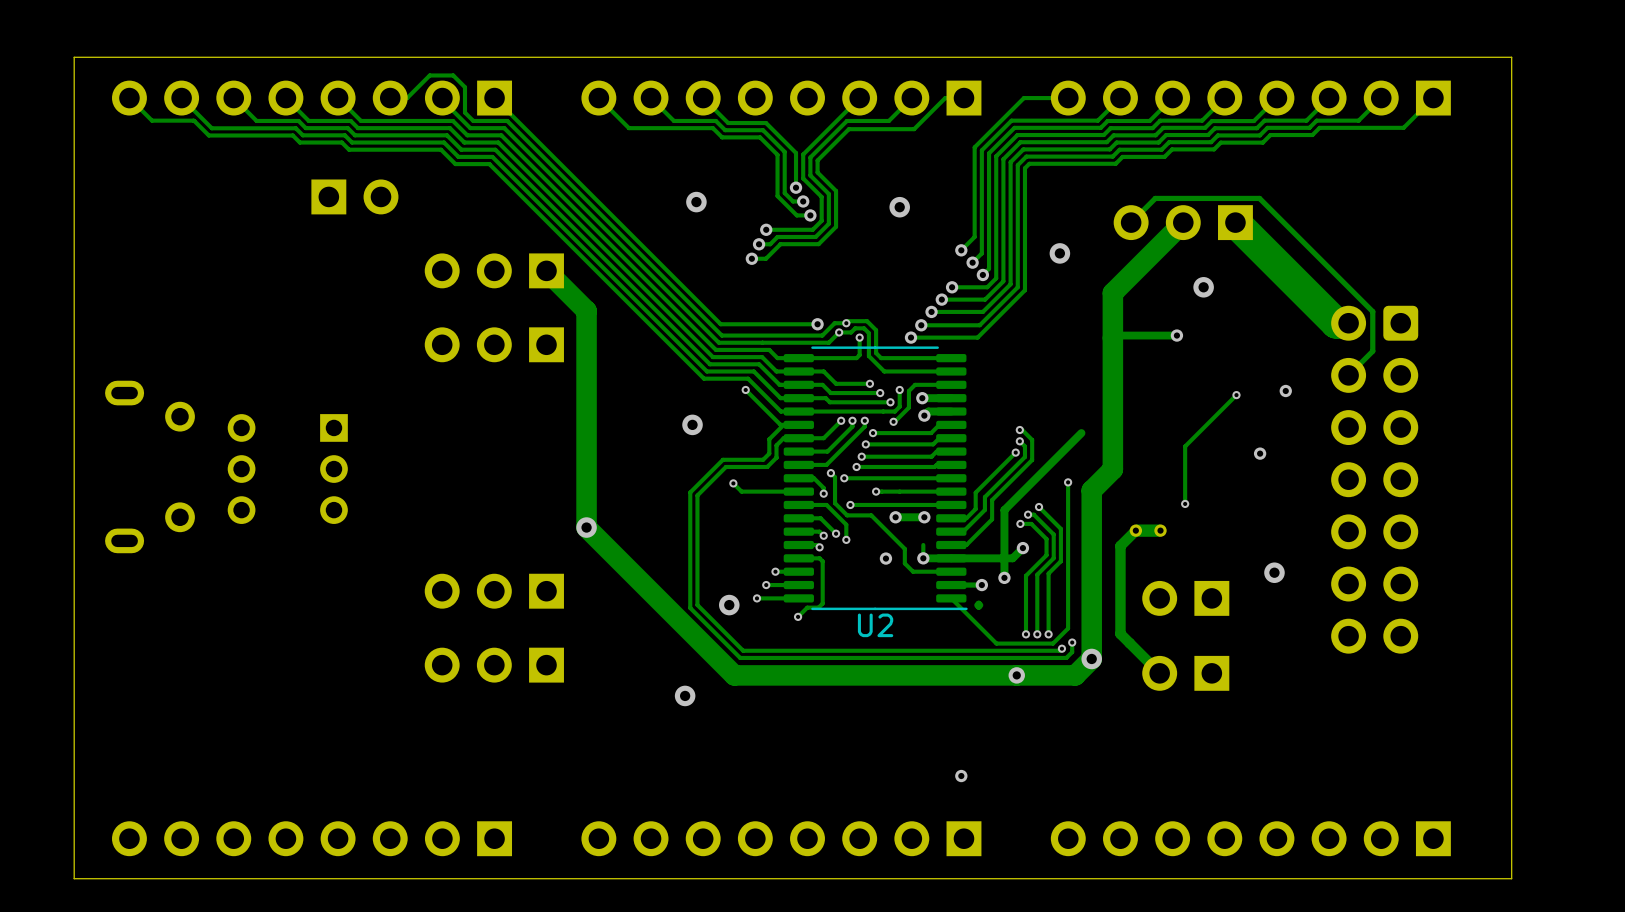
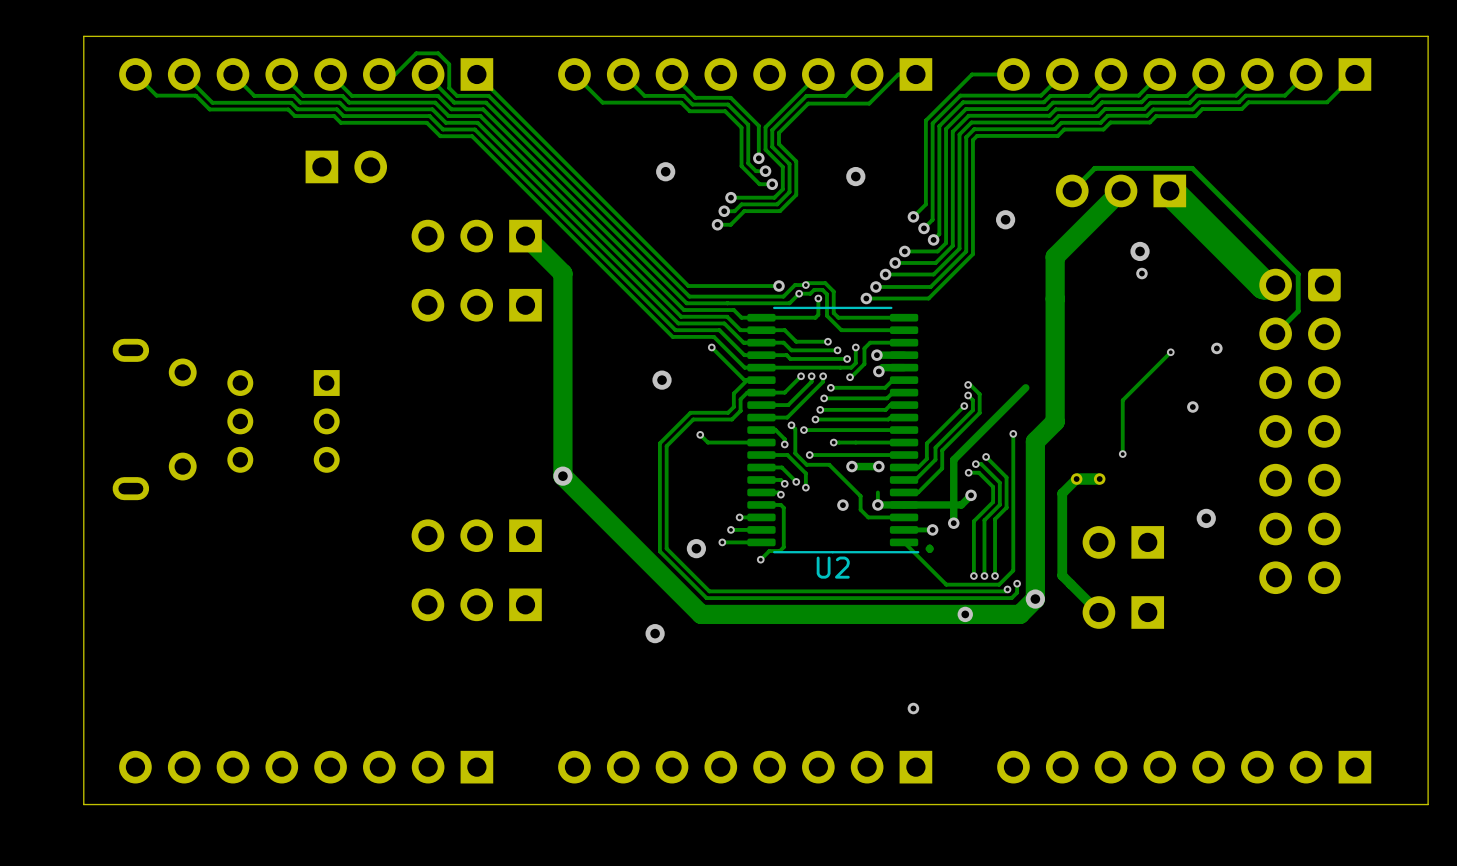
track: (1176, 335) (1115, 335) -> none
via position: (1176, 335) -> (1141, 273)

